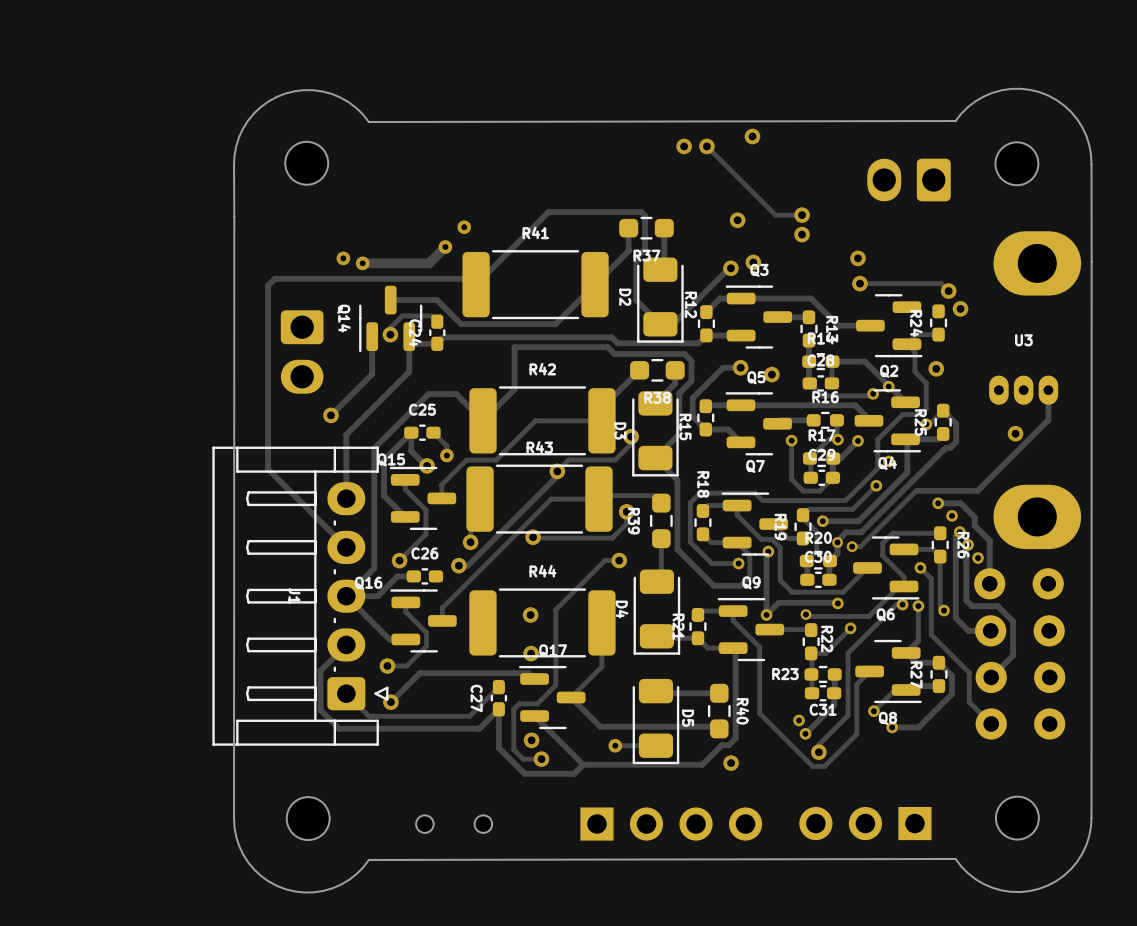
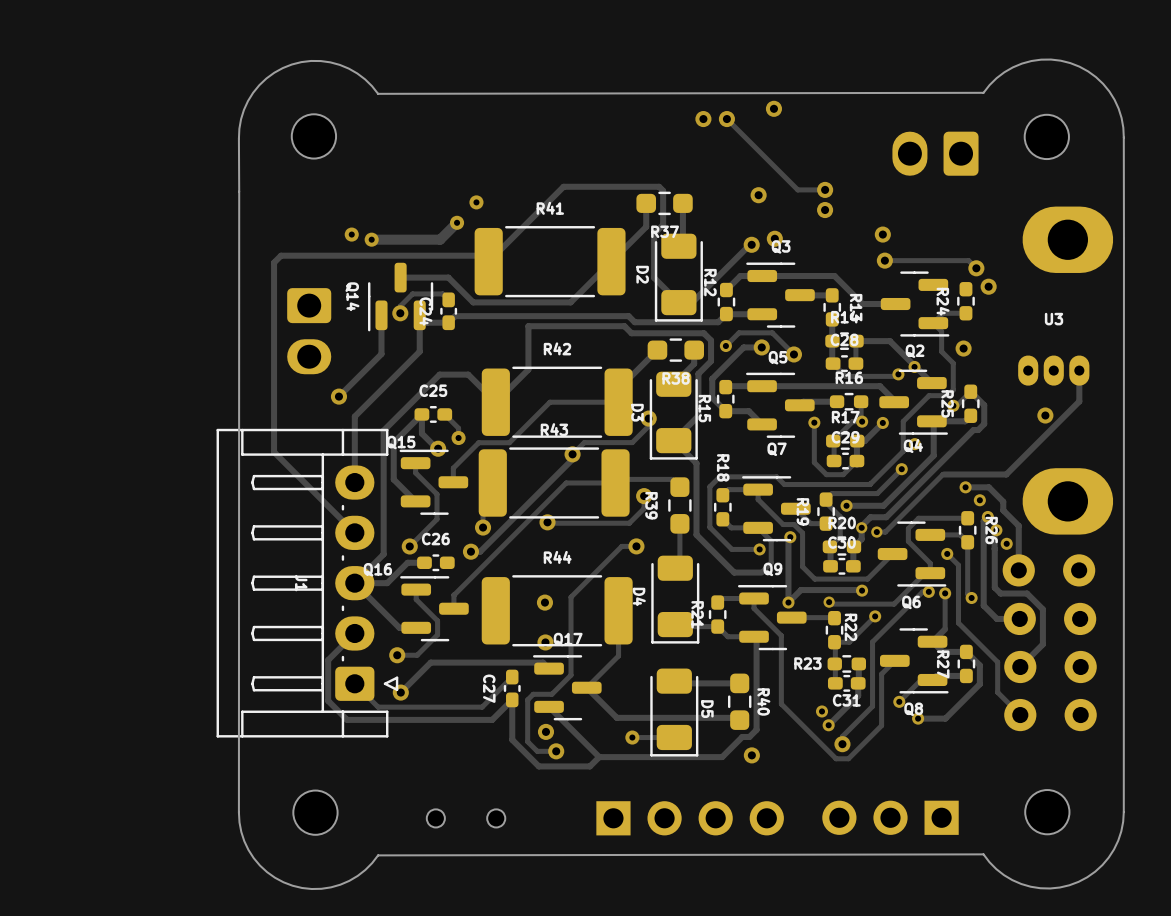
track: none -> (725, 345) (739, 332) (772, 332) (793, 354)
via: none -> (725, 345)

